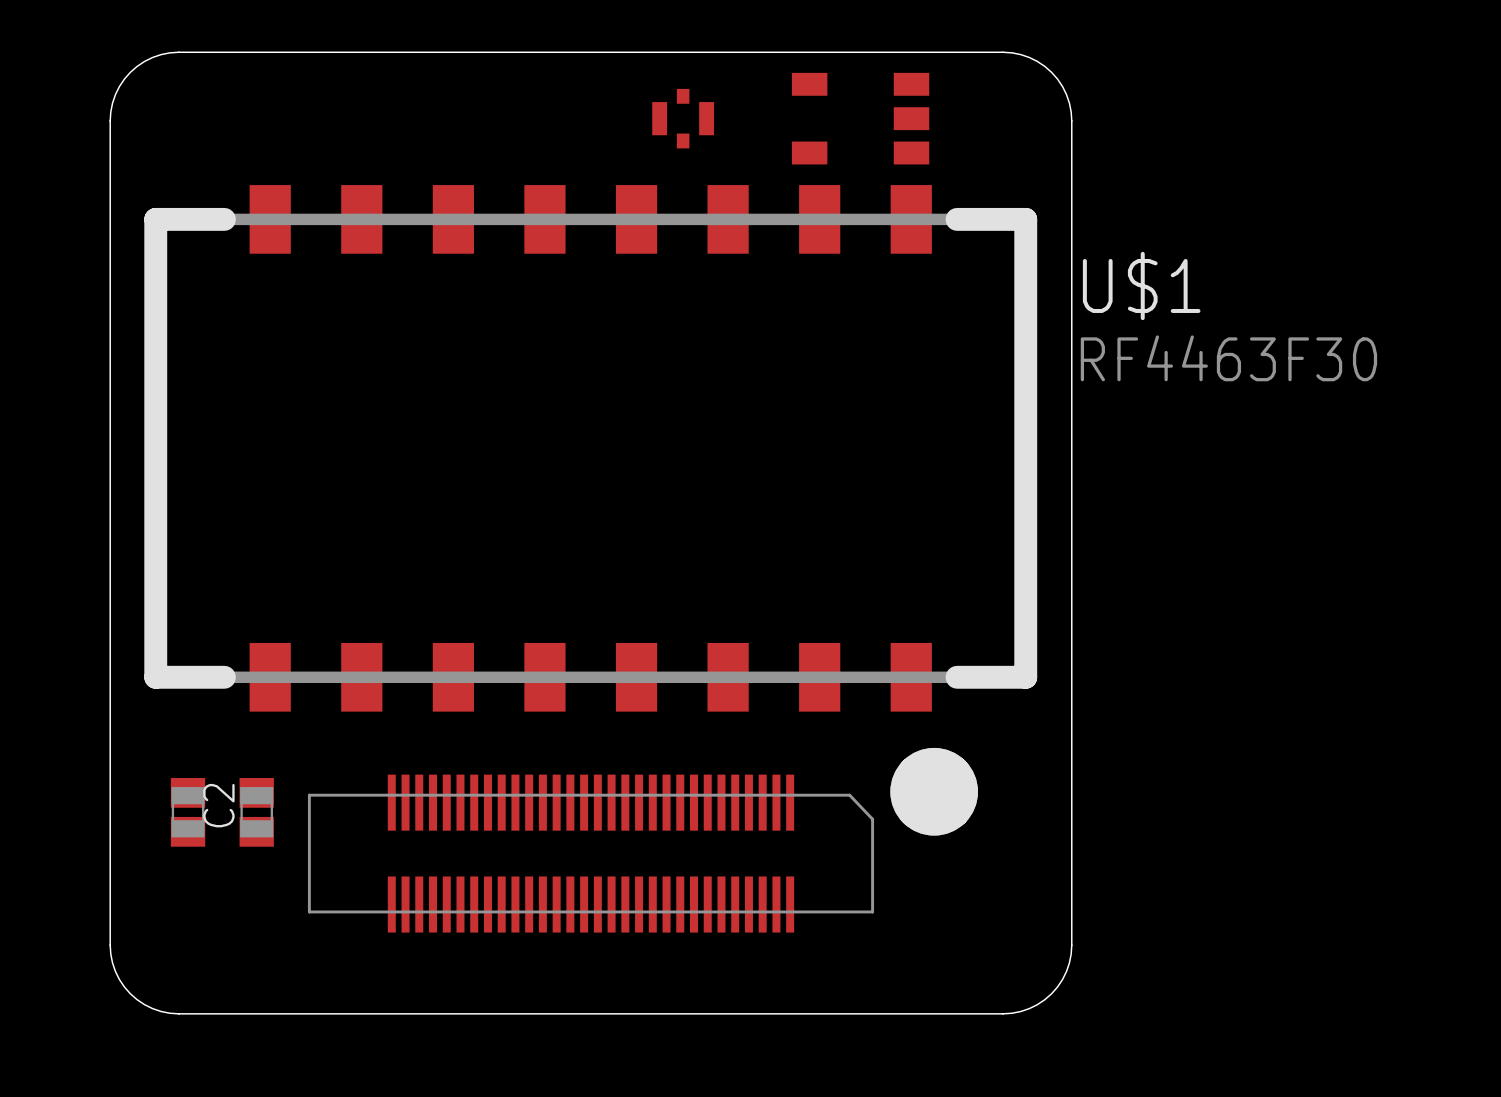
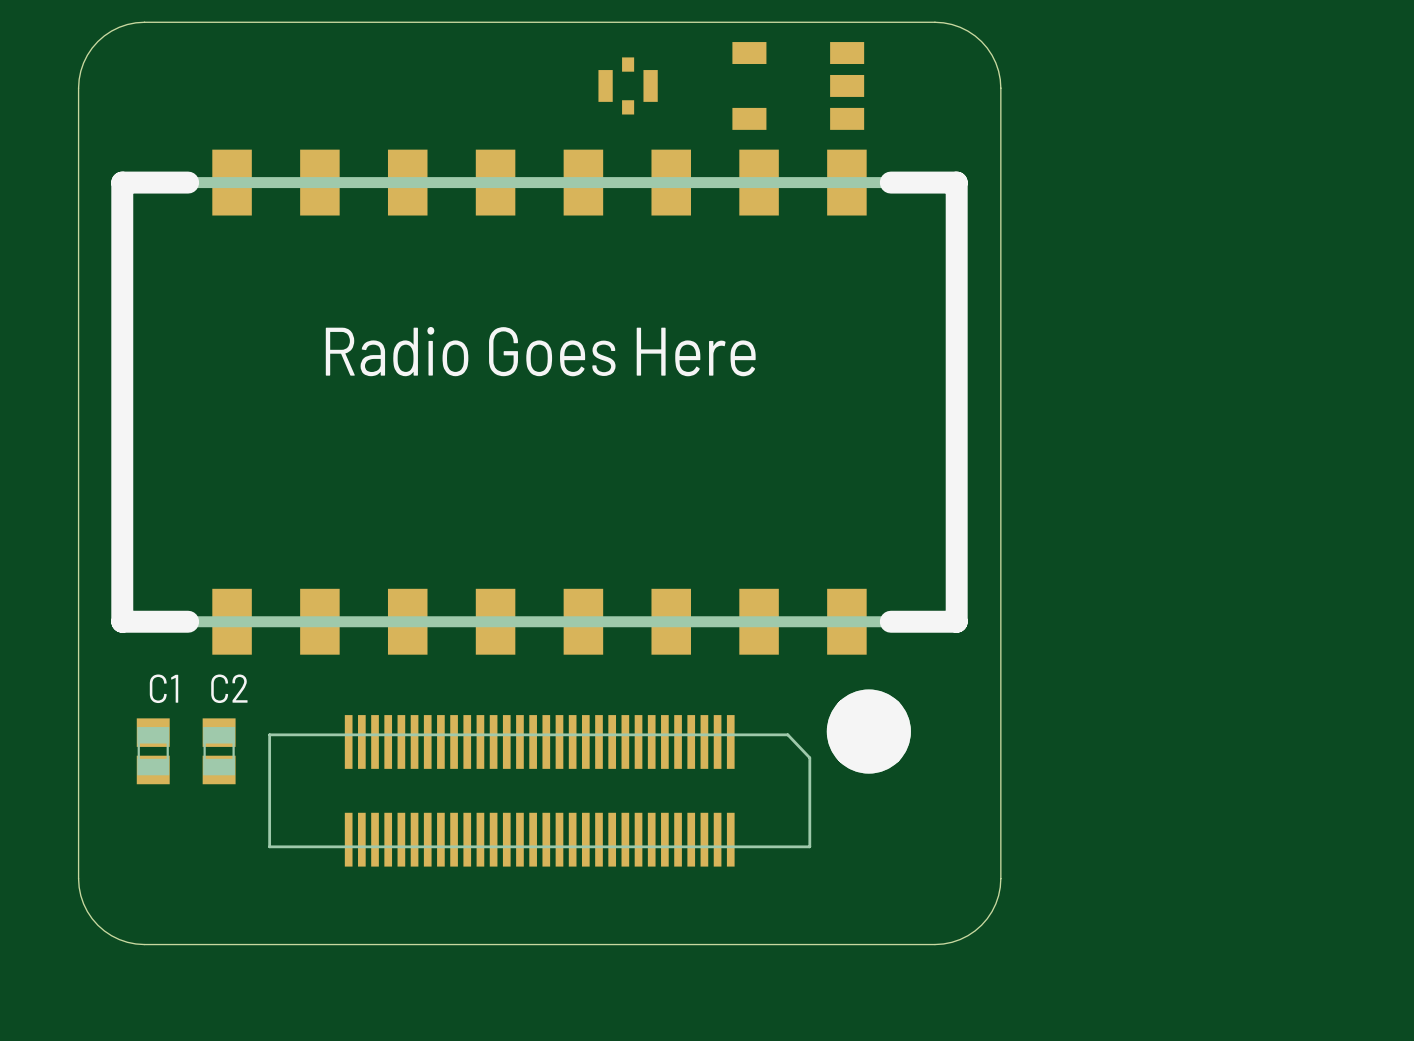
U$1 name: U$1 (1141, 285) -> none
U$1 value: RF4463F30 (1228, 358) -> none
text: none -> Radio Goes Here (540, 351)
C1 name: none -> C1 (164, 688)
C2 name rotation: 0° (218, 805) -> 90° clockwise (229, 688)

